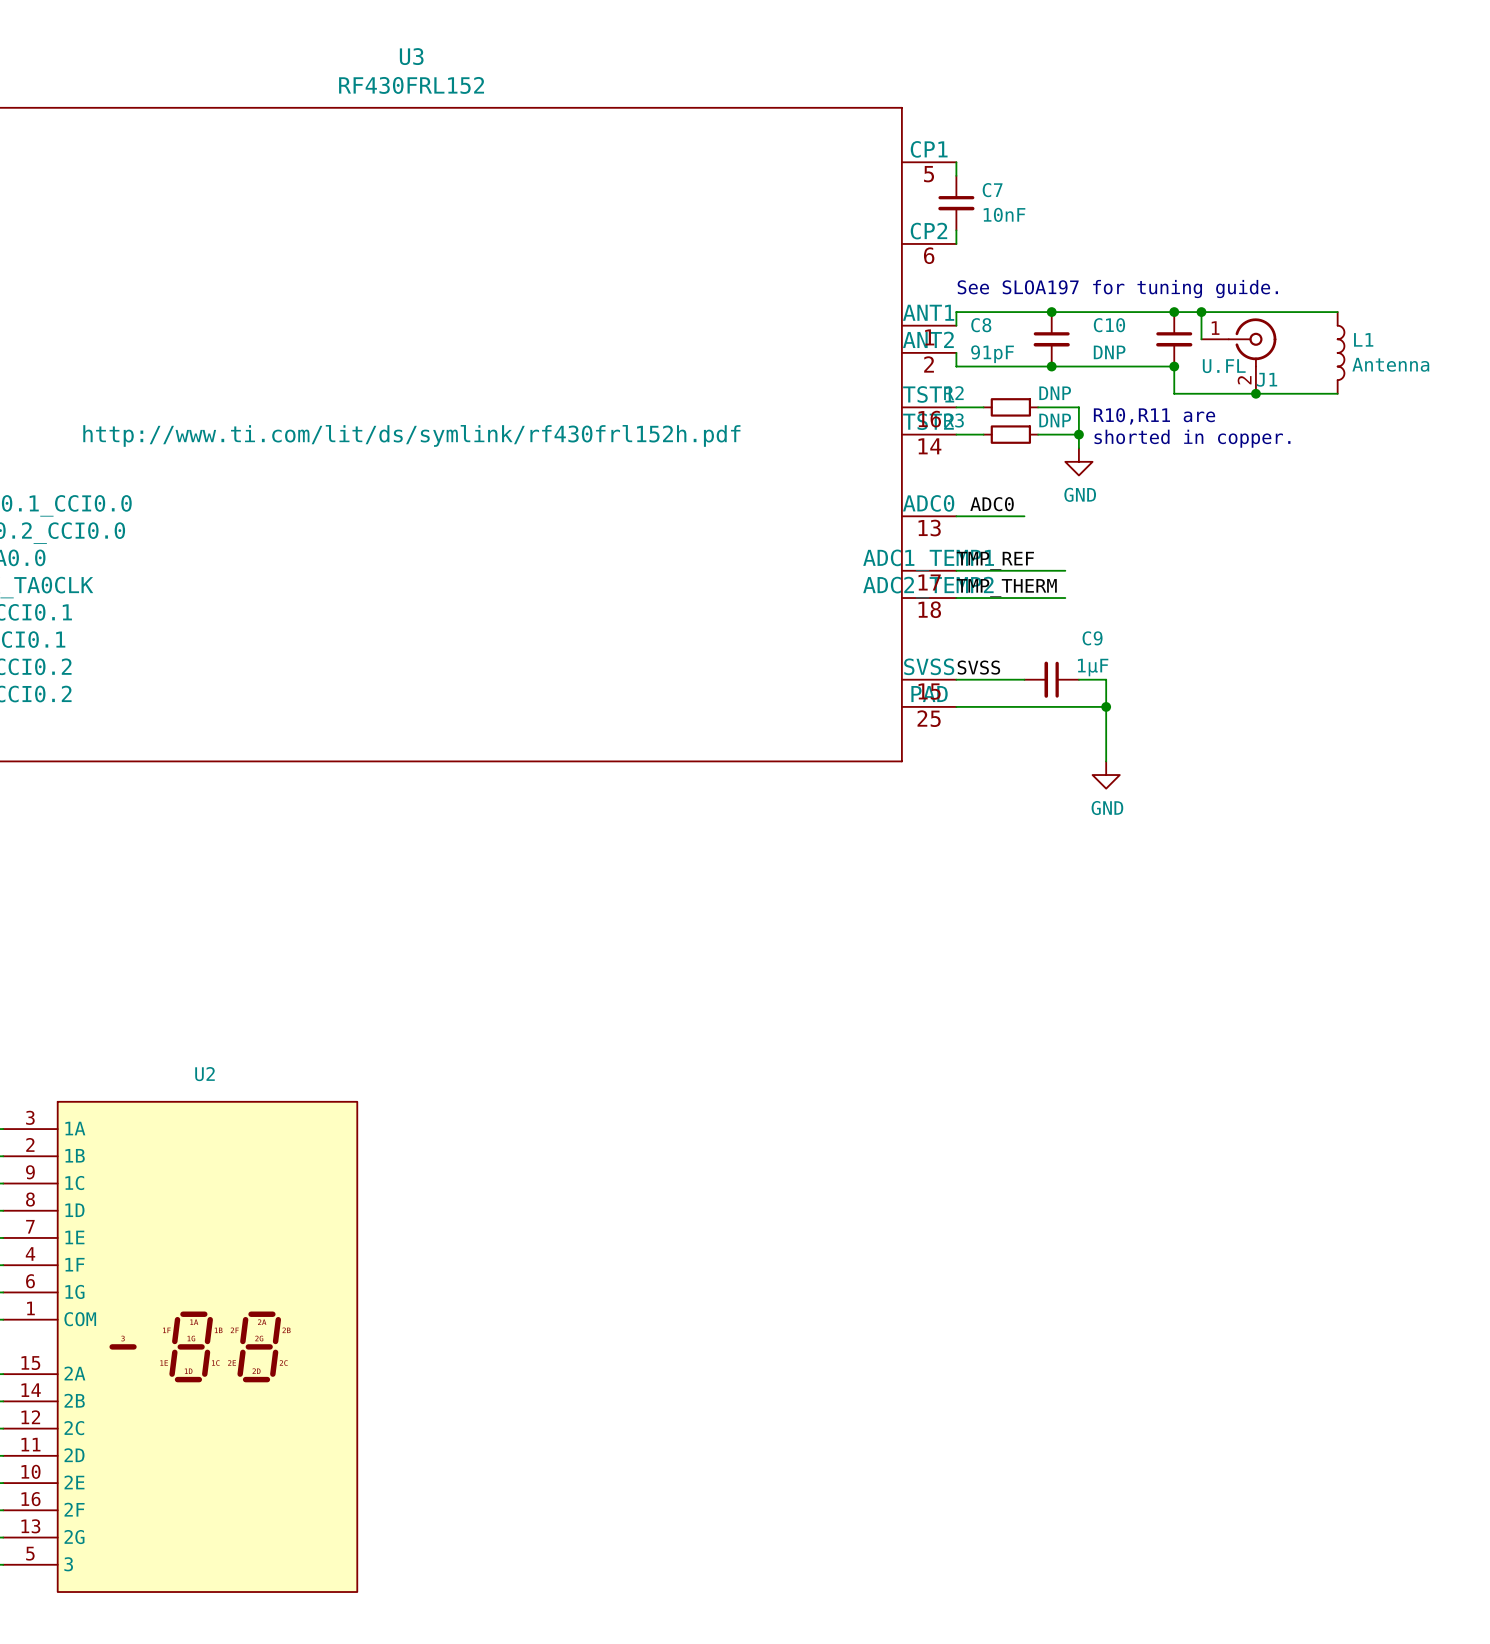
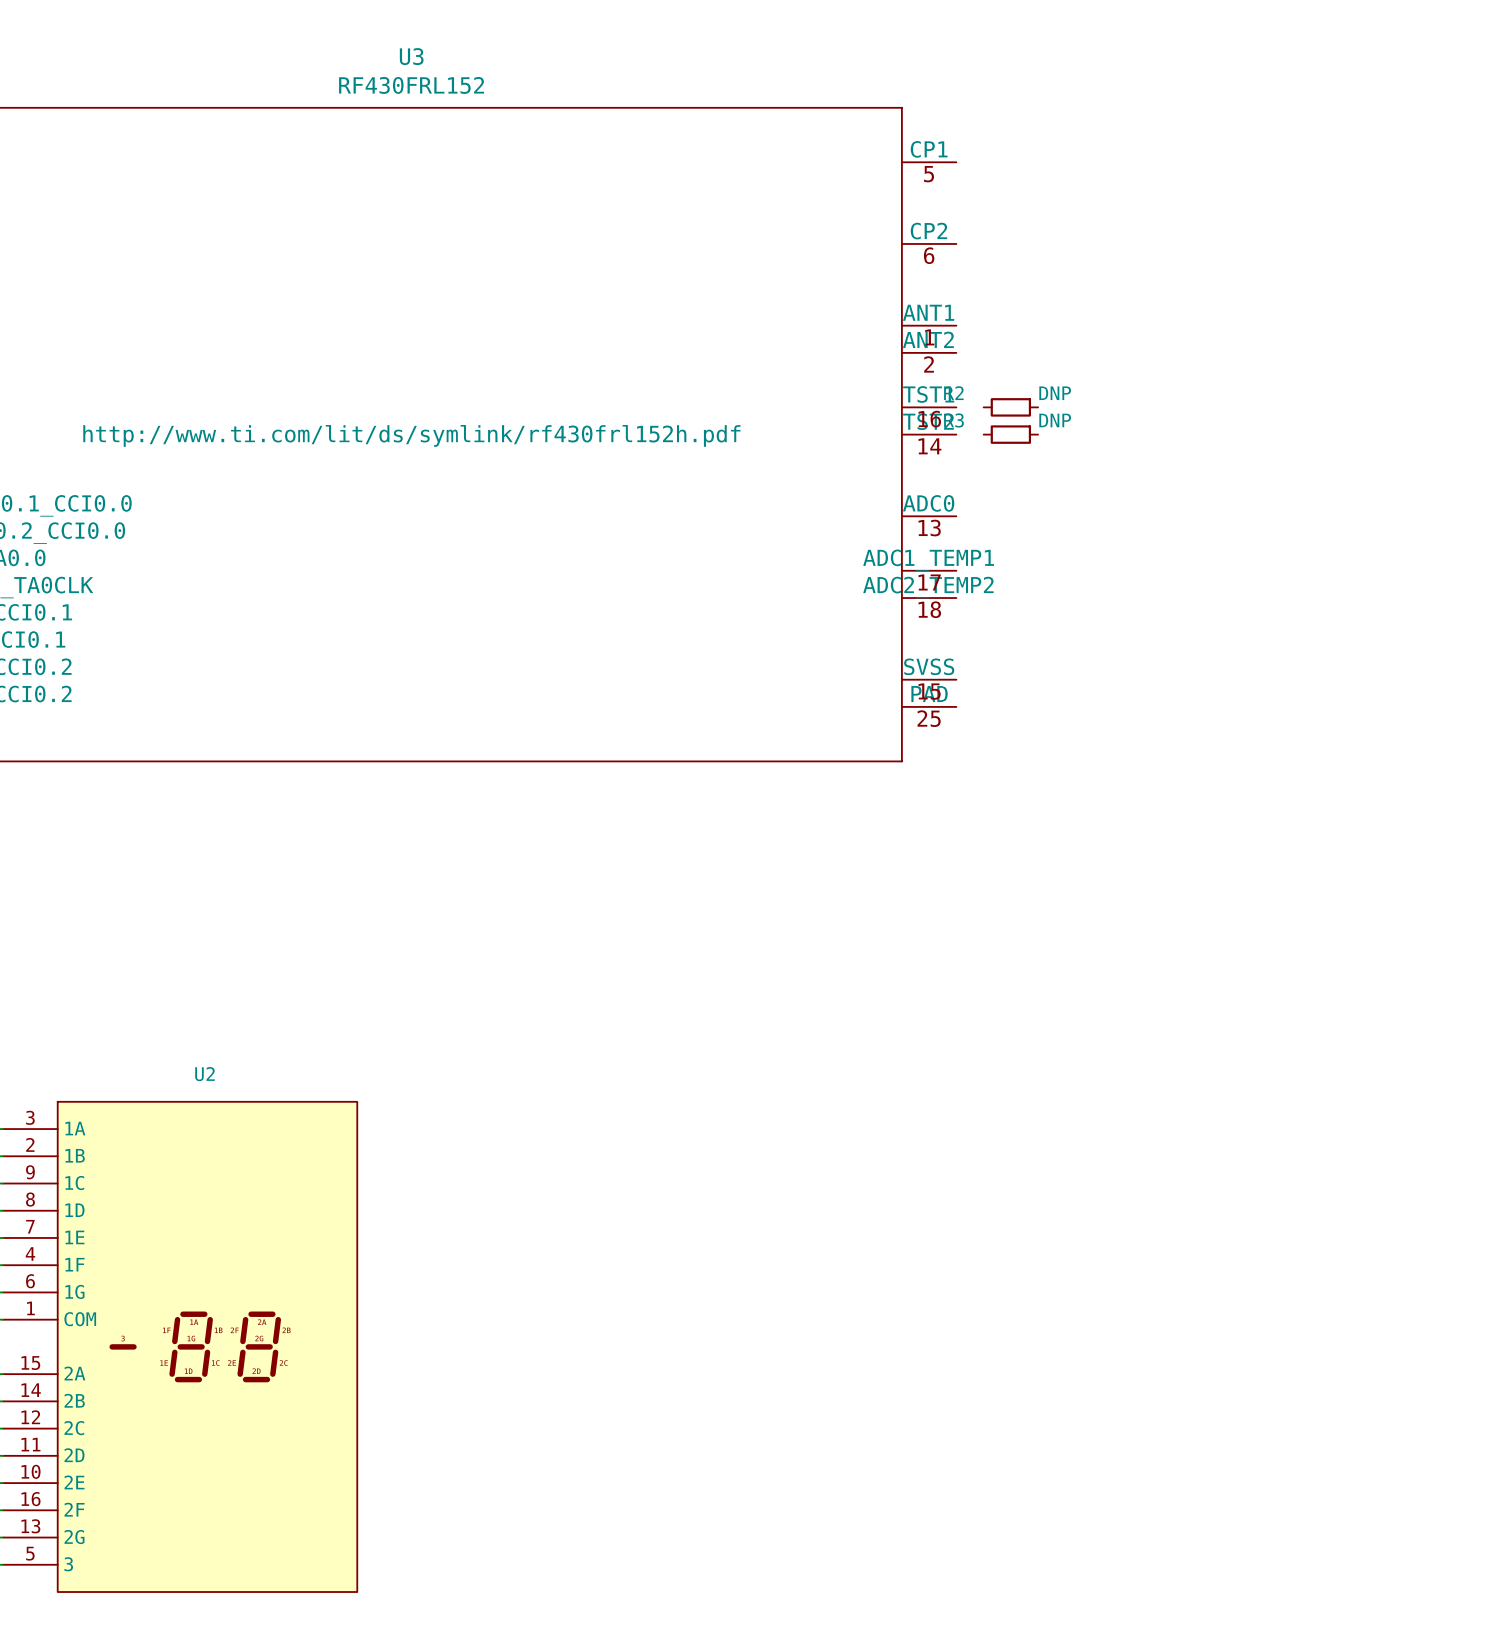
wire: (956, 162) (956, 175) -> none
C7: 10nF (956, 203) -> none
wire: (956, 230) (956, 243) -> none
text: See SLOA197 for tuning guide. (1117, 289) -> none
junction: (1051, 312) -> none
junction: (1174, 312) -> none
wire: (1201, 312) (1201, 339) -> none
junction: (1201, 312) -> none
wire: (1337, 312) (956, 312) (956, 325) -> none
C8: 91pF (1051, 339) -> none
C10: DNP (1174, 339) -> none
wire: (956, 352) (956, 366) (1174, 366) (1174, 393) (1337, 393) -> none
L1: Antenna (1341, 352) -> none
J1: U.FL (1238, 356) -> none
junction: (1051, 366) -> none
junction: (1174, 366) -> none
junction: (1255, 393) -> none
wire: (956, 407) (983, 407) -> none
wire: (1038, 407) (1078, 407) (1078, 448) -> none
text: R10,R11 are (1154, 416) -> none
wire: (956, 434) (983, 434) -> none
wire: (1038, 434) (1078, 434) -> none
junction: (1078, 434) -> none
text: shorted in copper. (1192, 438) -> none
power symbol: GND (1078, 461) -> none
label: ADC0 (992, 504) -> none
wire: (956, 516) (1024, 516) -> none
label: TMP_REF (995, 560) -> none
wire: (956, 570) (1065, 570) -> none
label: TMP_THERM (1006, 588) -> none
wire: (956, 598) (1065, 598) -> none
label: SVSS (978, 667) -> none
wire: (956, 679) (1024, 679) -> none
C9: 1µF (1051, 679) -> none
wire: (1078, 679) (1106, 679) (1106, 761) -> none
wire: (956, 706) (1106, 706) -> none
junction: (1106, 706) -> none
power symbol: GND (1106, 775) -> none

